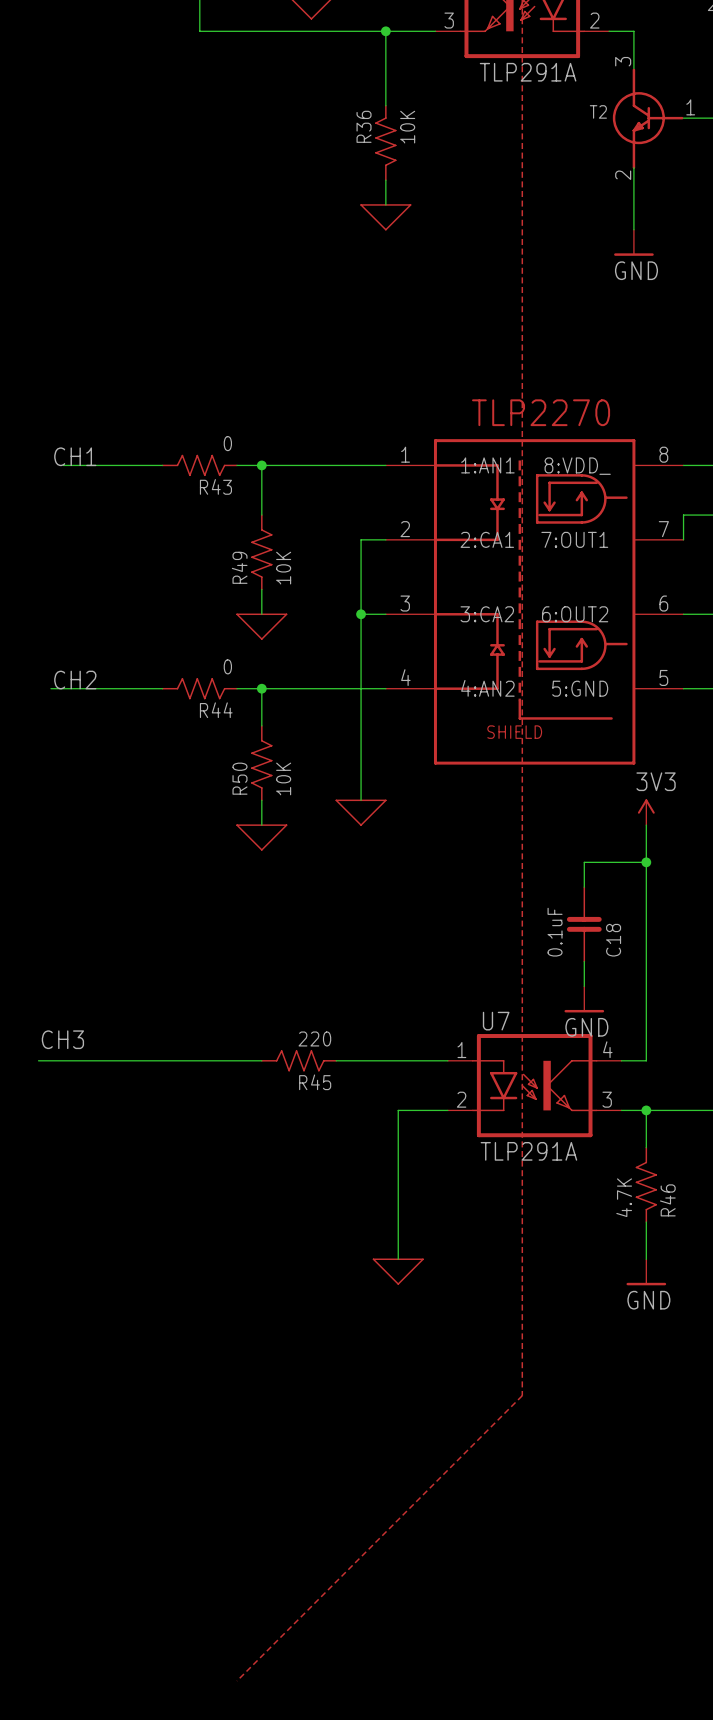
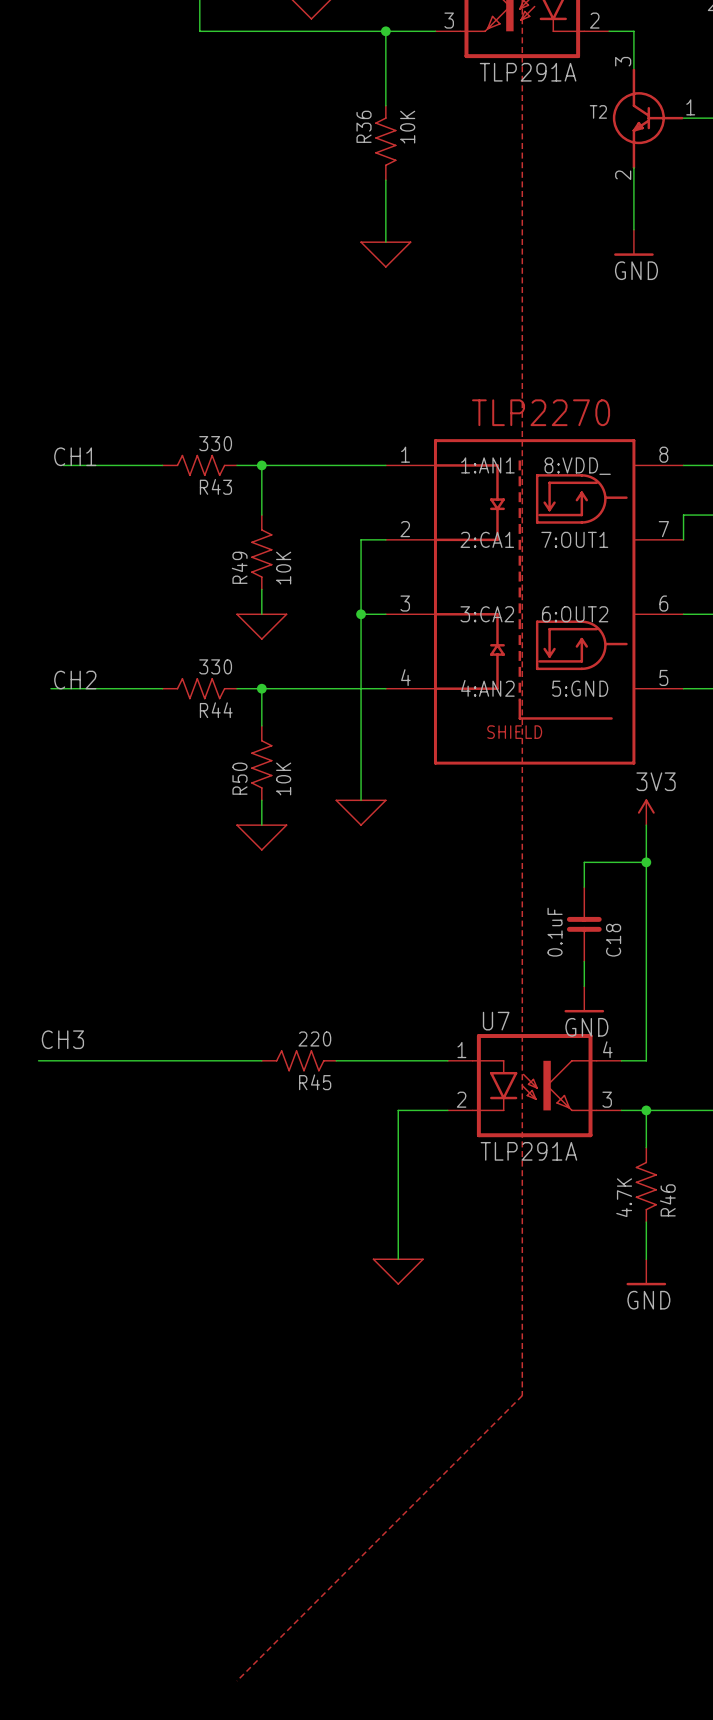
wire: none -> (385, 204) (385, 242)
power symbol position: (385, 217) -> (385, 254)
R43 value: 0 (227, 443) -> 330 (215, 443)
R44 value: 0 (227, 666) -> 330 (215, 666)

